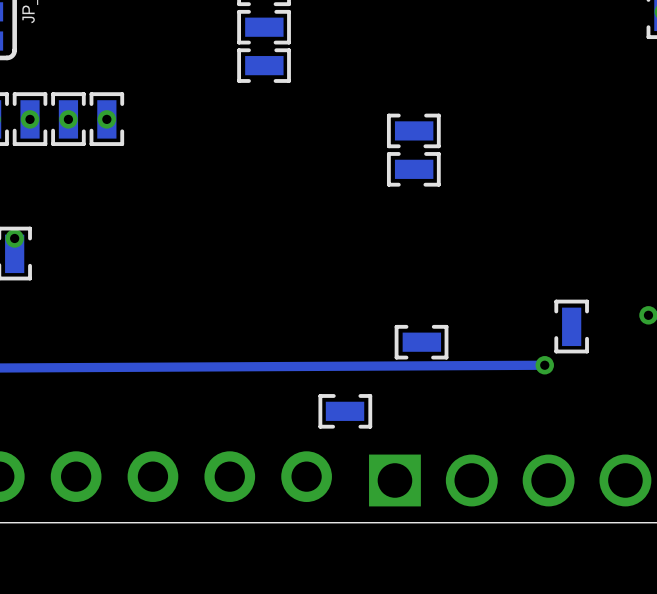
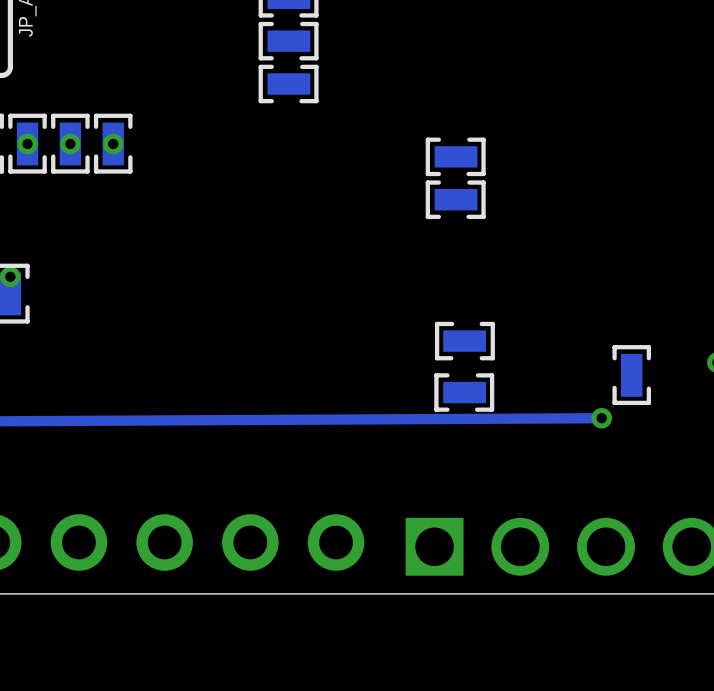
part position: (345, 411) -> (464, 341)

